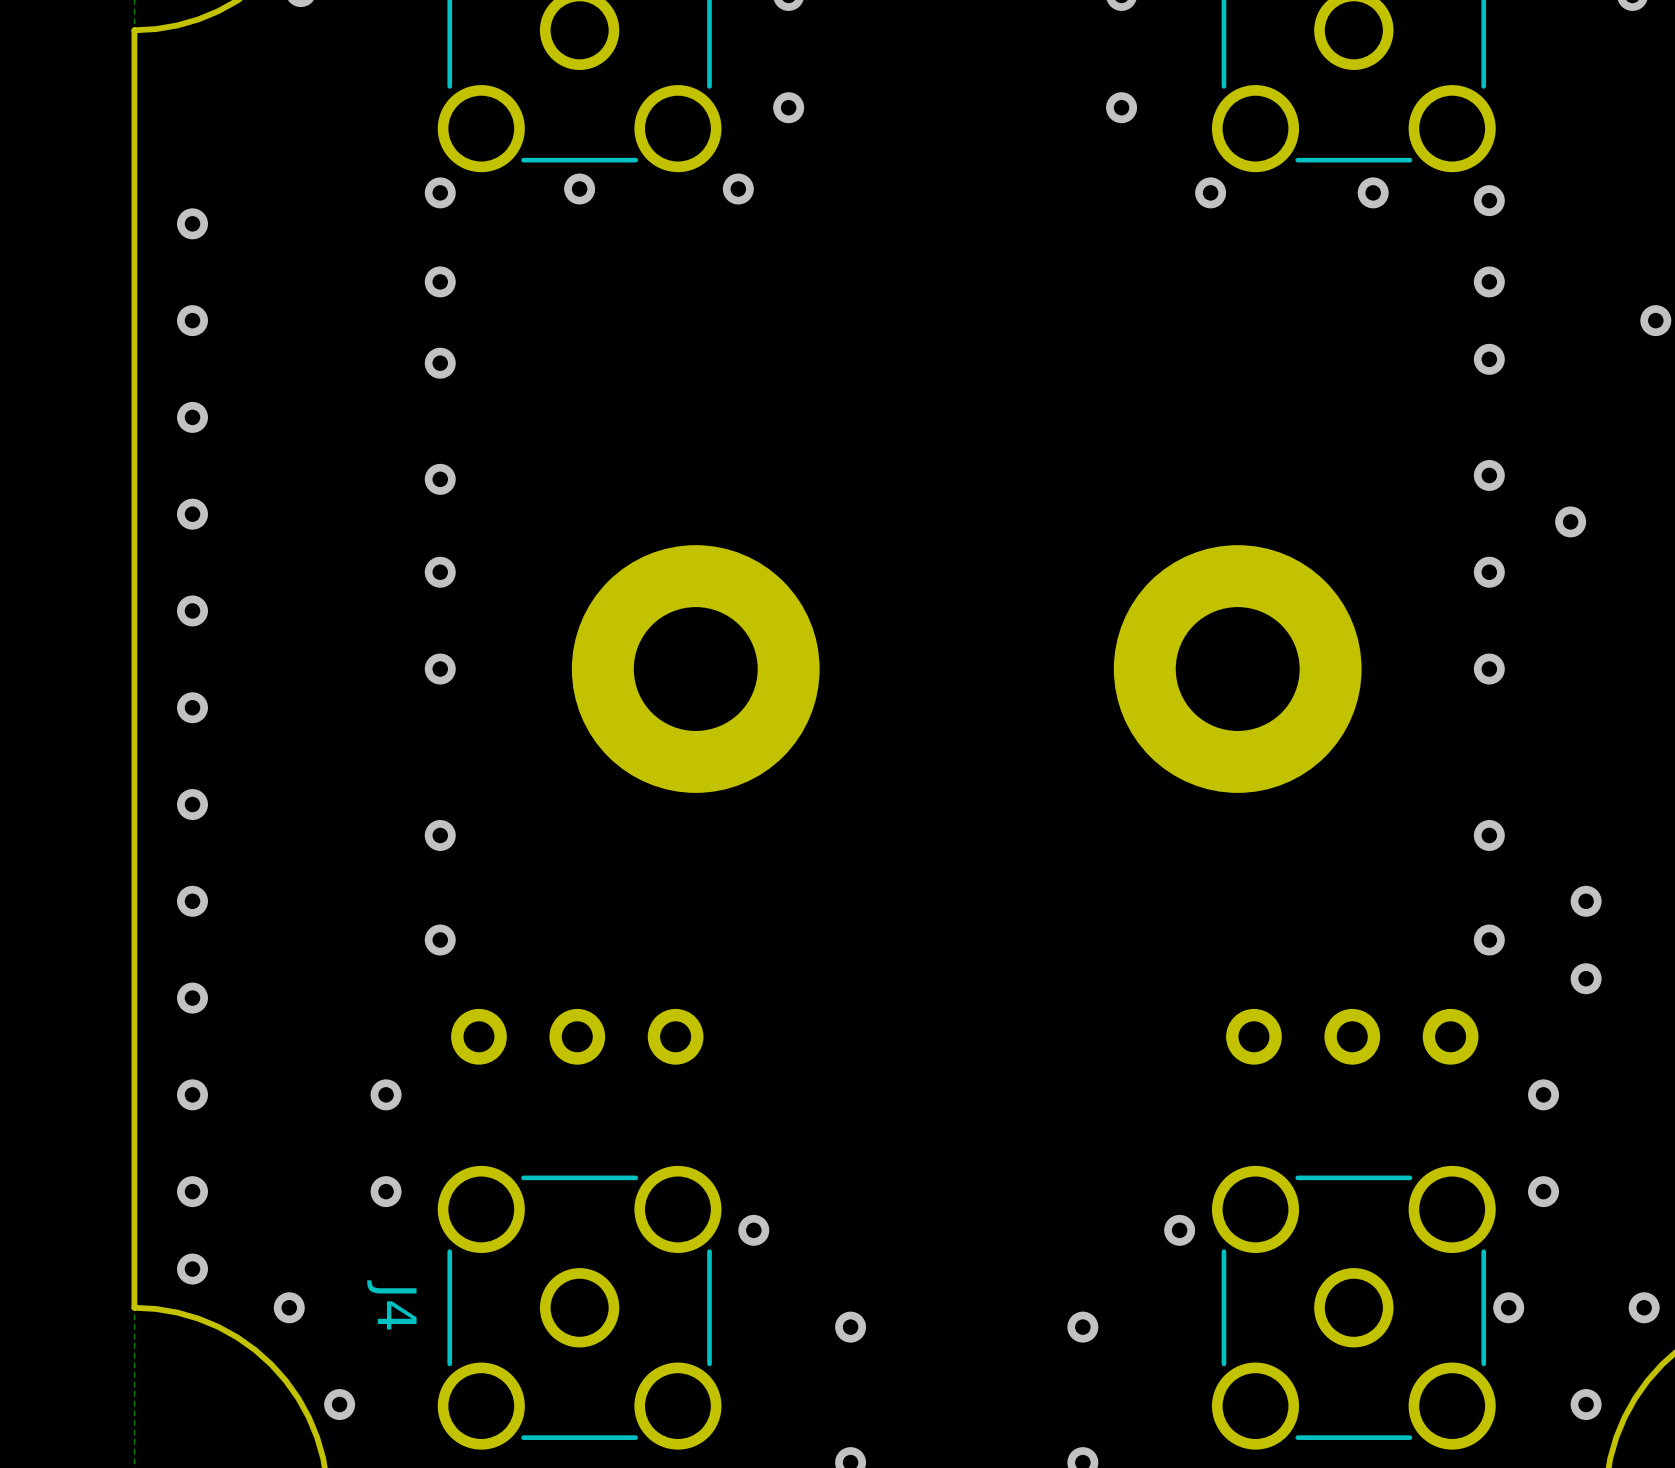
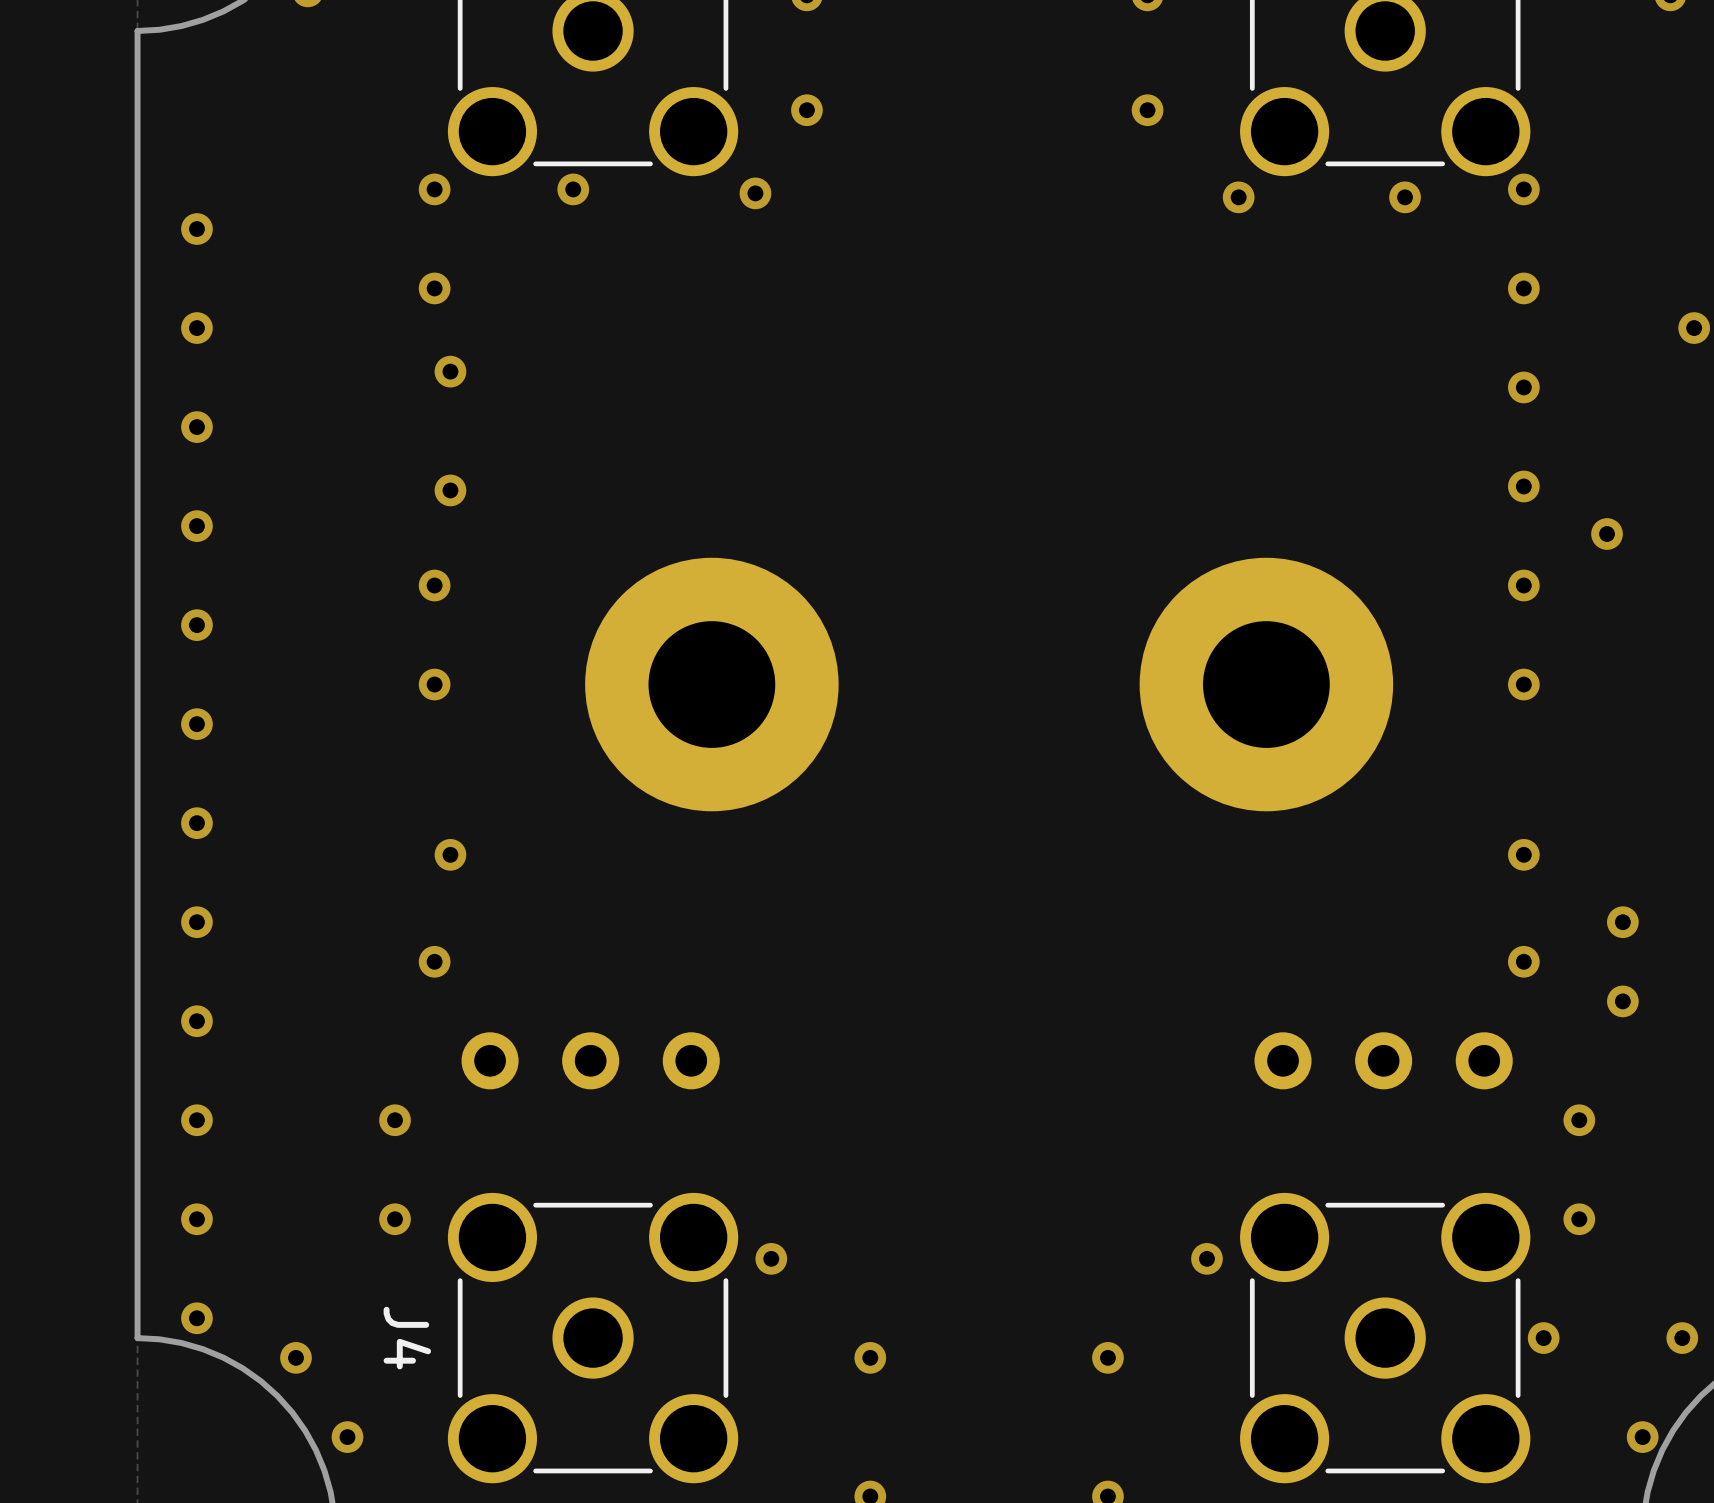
via position: (579, 189) -> (573, 189)
via position: (440, 192) -> (434, 189)
via position: (1489, 200) -> (1523, 189)
via position: (440, 281) -> (434, 288)
via position: (1489, 359) -> (1523, 387)
via position: (440, 572) -> (434, 585)
via position: (440, 669) -> (434, 684)
via position: (440, 940) -> (434, 961)
via position: (192, 1269) -> (196, 1318)
via position: (289, 1307) -> (295, 1357)
via position: (1586, 1404) -> (1642, 1437)

